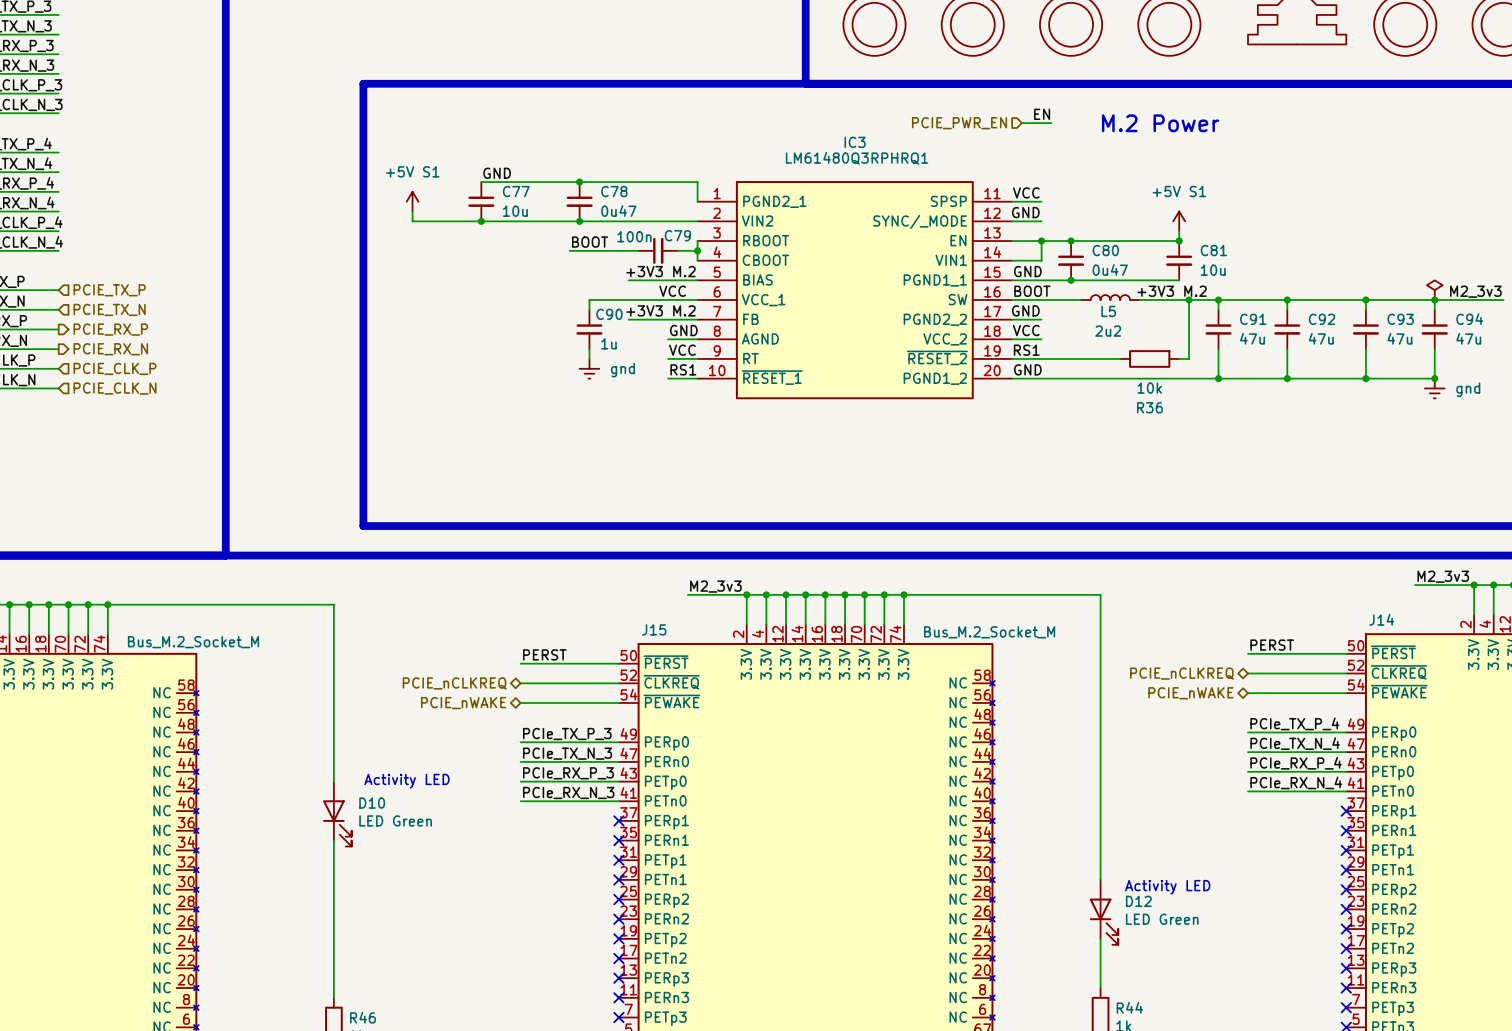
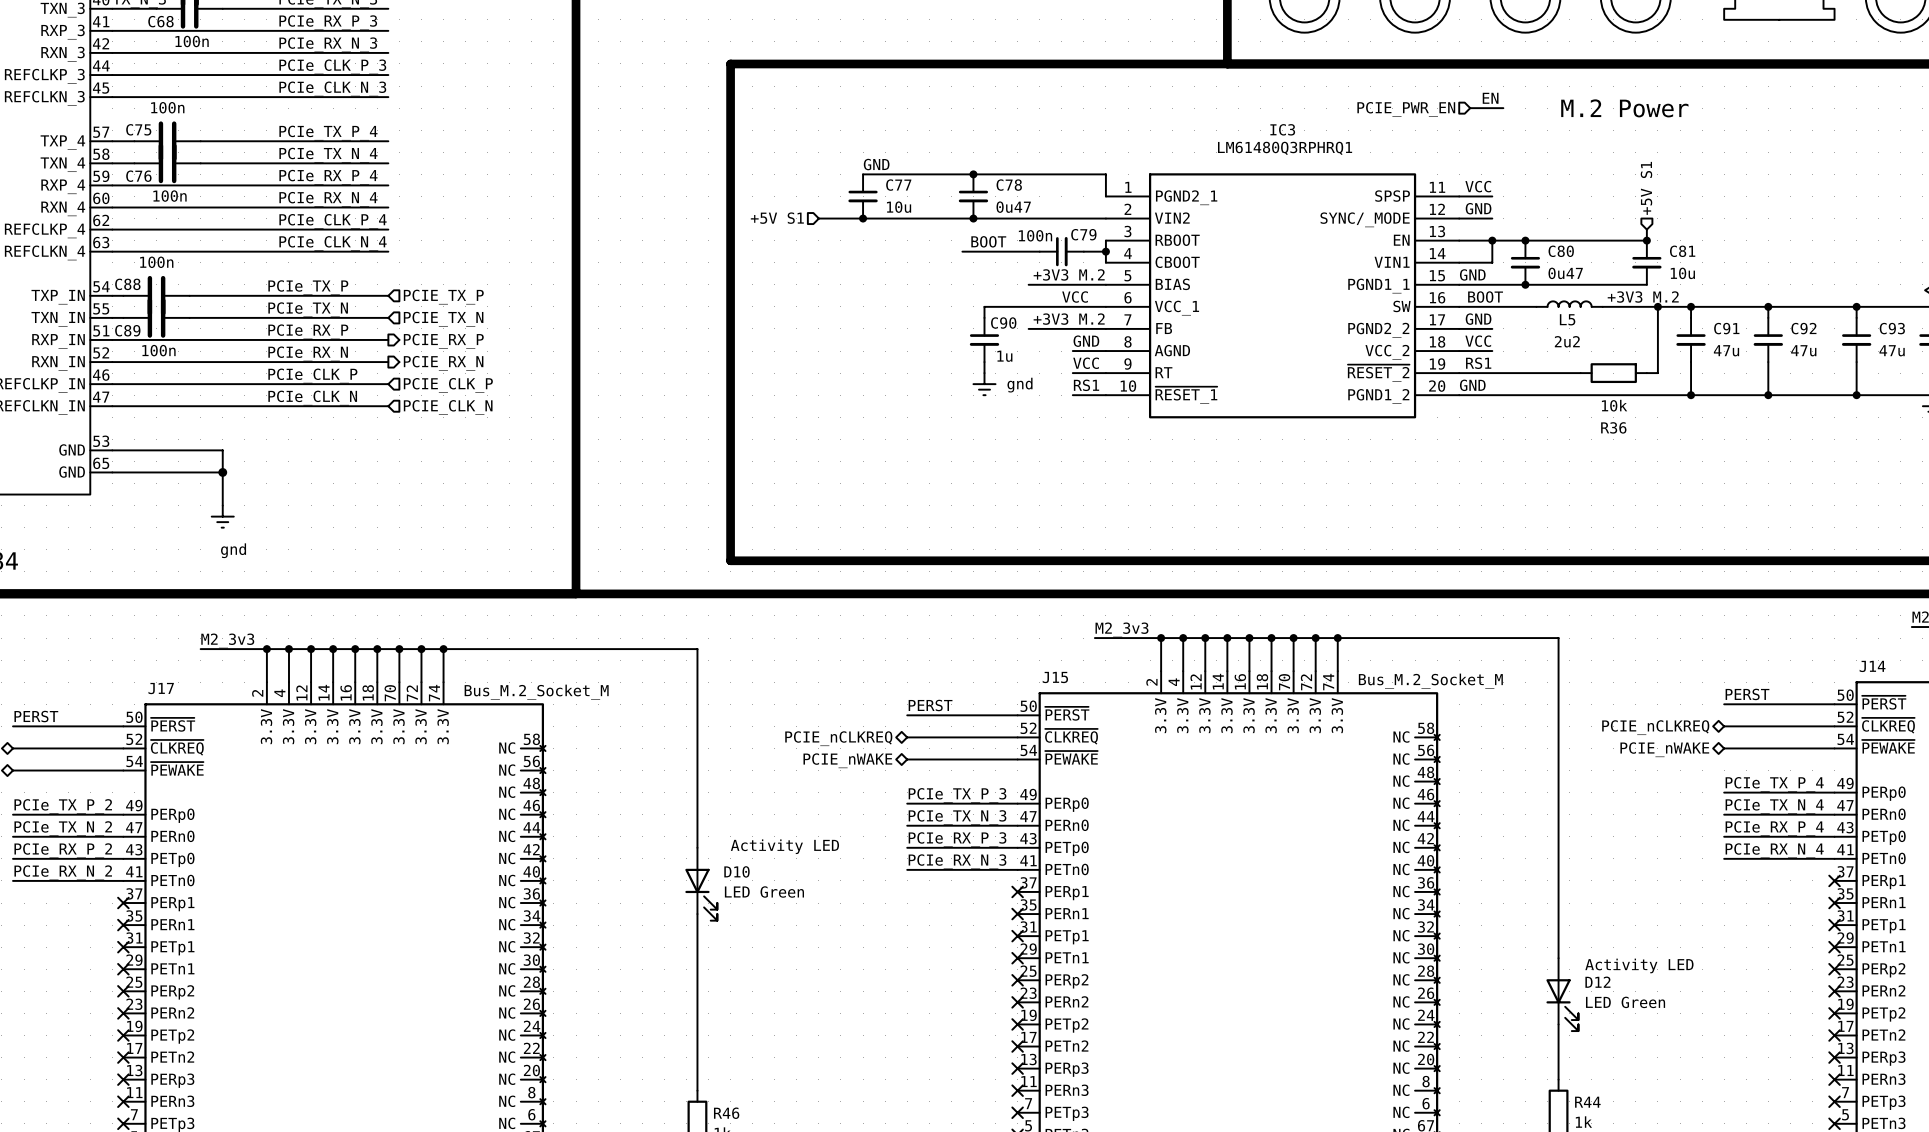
hierarchical label: none -> +5V S1 (1646, 188)
power symbol: +5V S1 (412, 201) -> none
wire: (412, 211) (412, 221) (442, 221) -> none
hierarchical label: none -> +5V S1 (777, 218)
power symbol: +5V S1 (1179, 221) -> none

